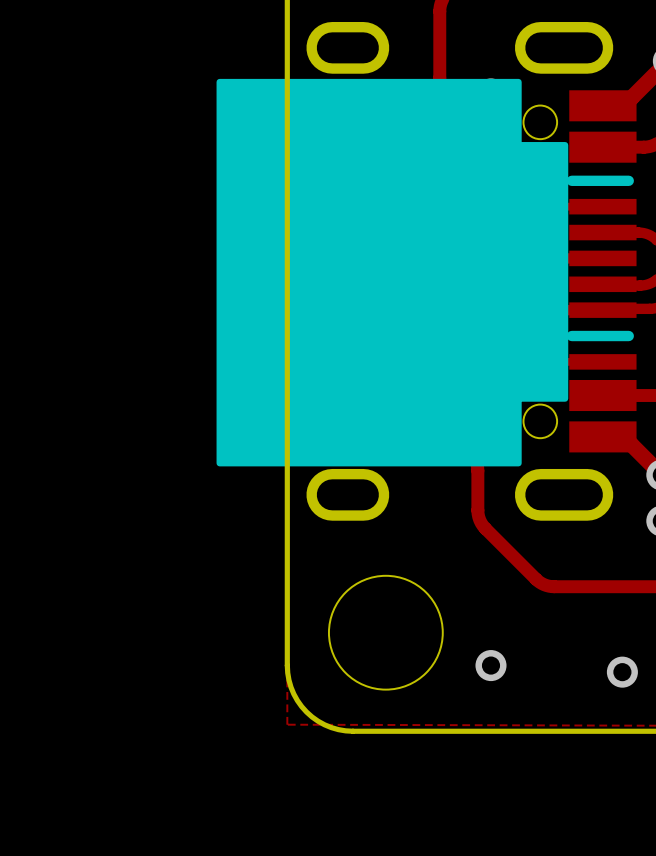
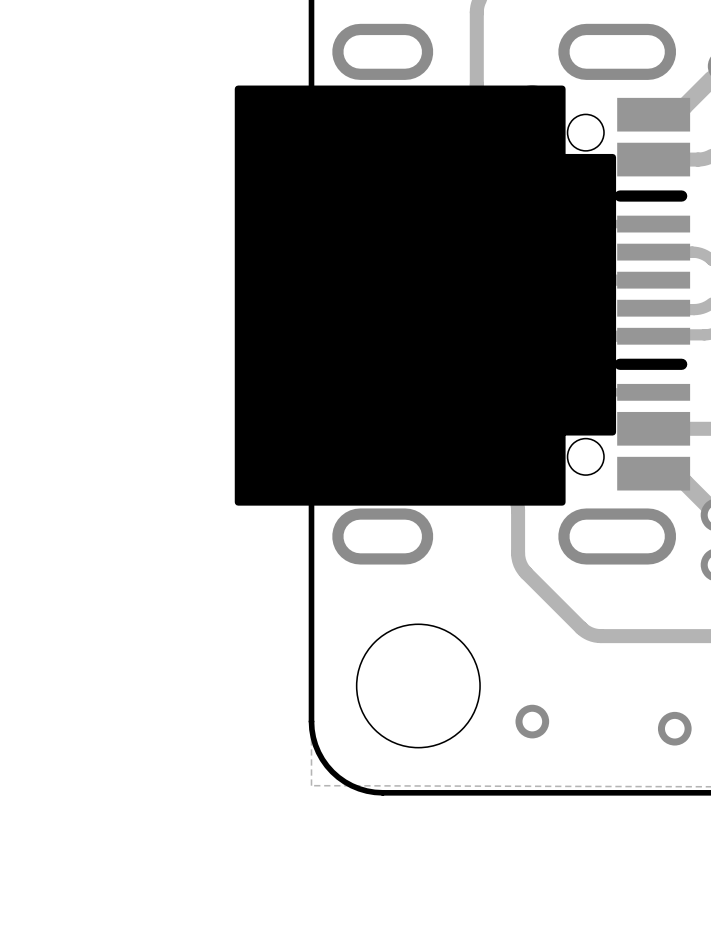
part footprint: [216, 21, 637, 521] -> [234, 23, 691, 565]

